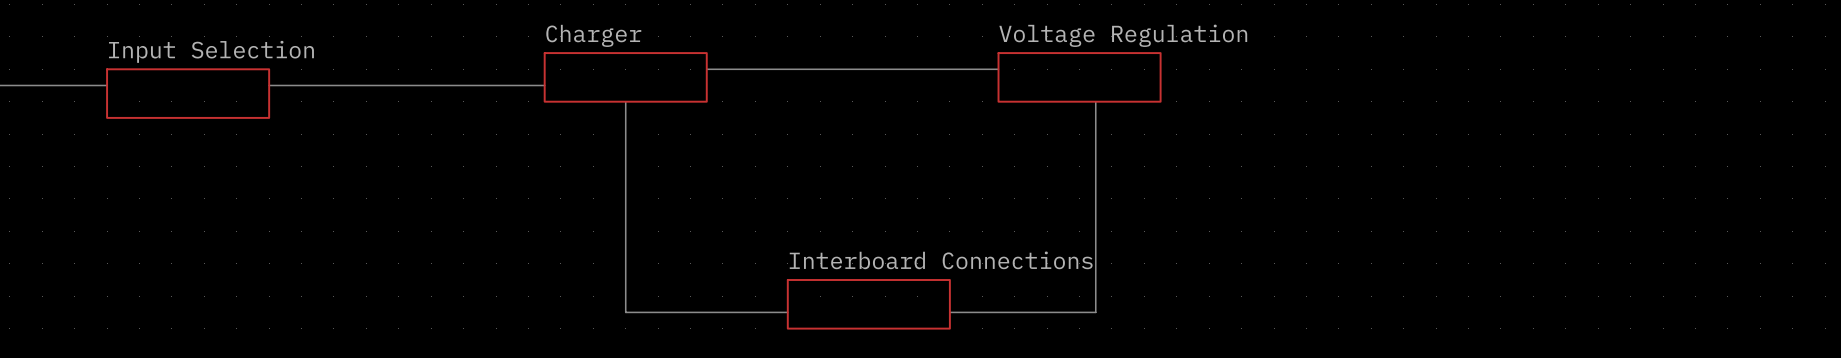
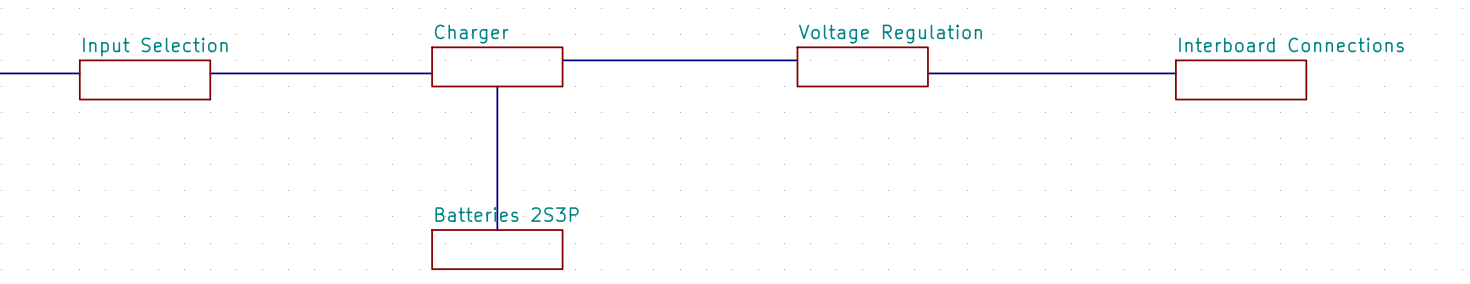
line: none -> (927, 73) (1175, 73)
sheet Interboard Connections: none -> (1241, 79)
line: (1095, 101) (1095, 312) (949, 312) -> none
line: (625, 279) (625, 312) (787, 312) -> none
sheet Batteries 2S3P: none -> (497, 249)
sheet Interboard Connections: (868, 304) -> none

